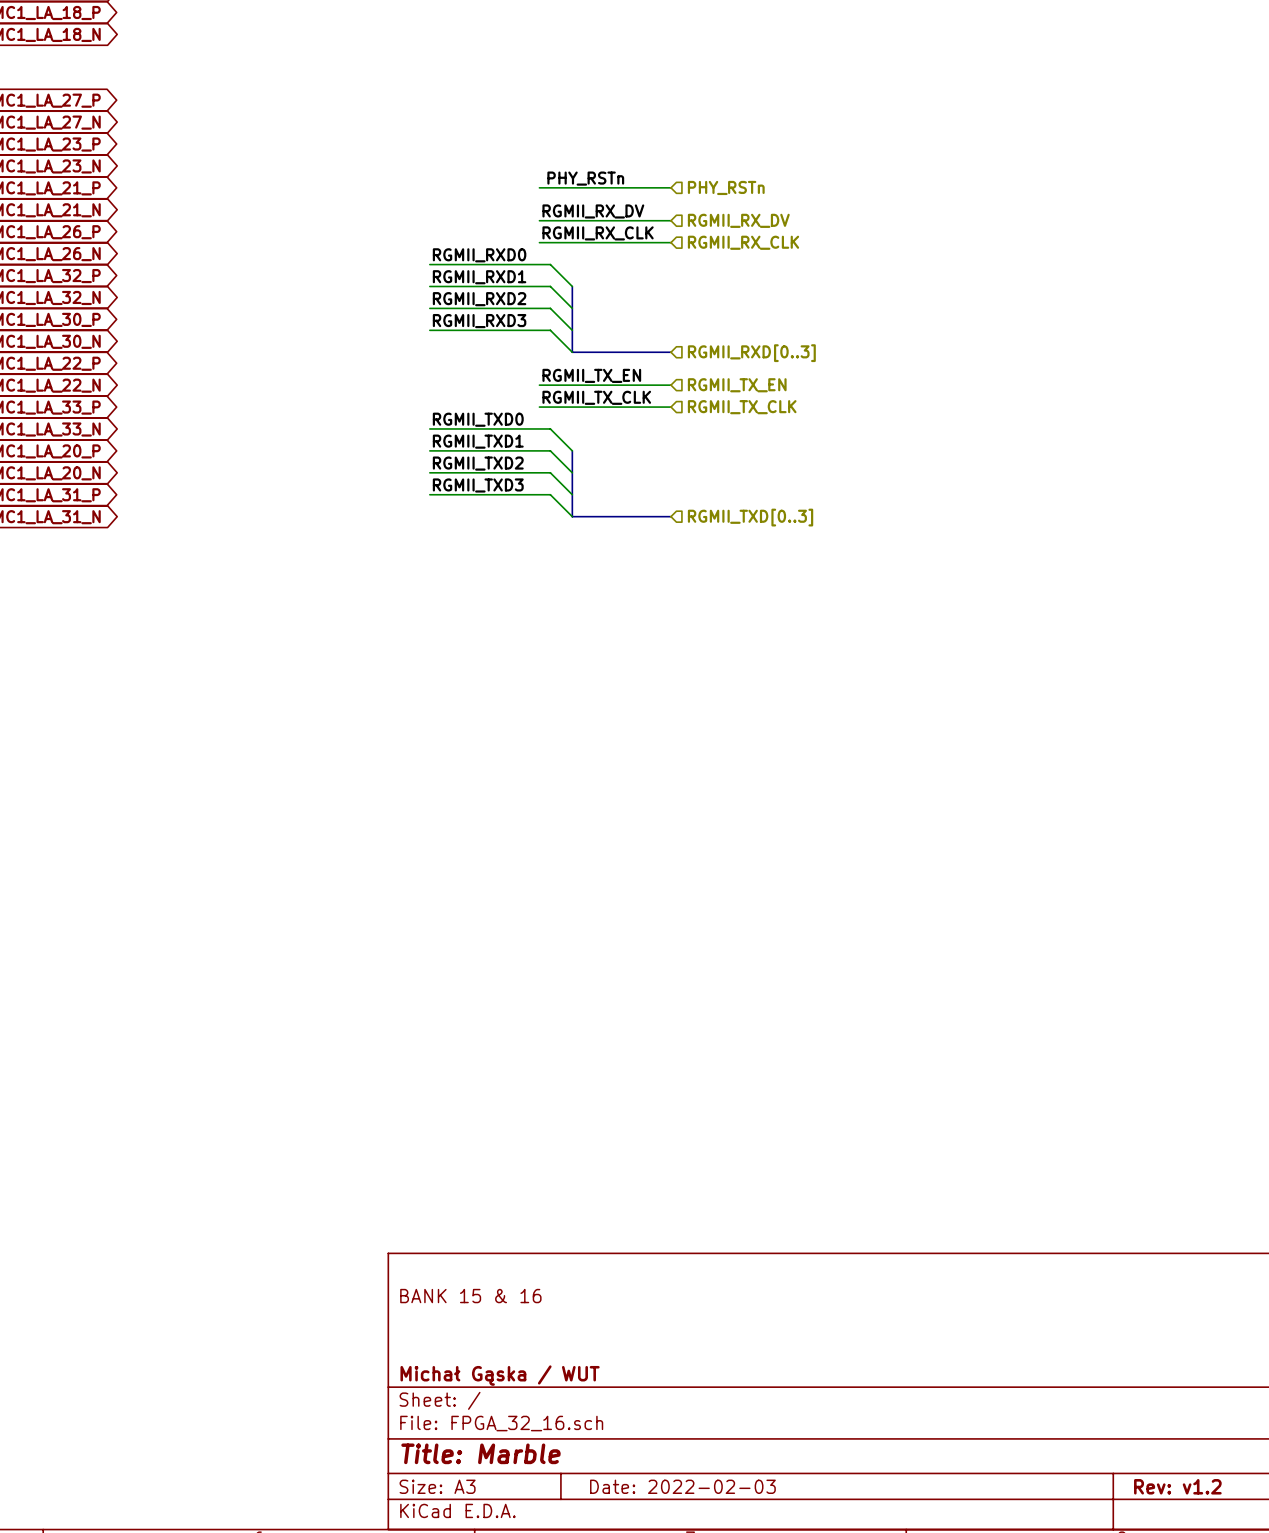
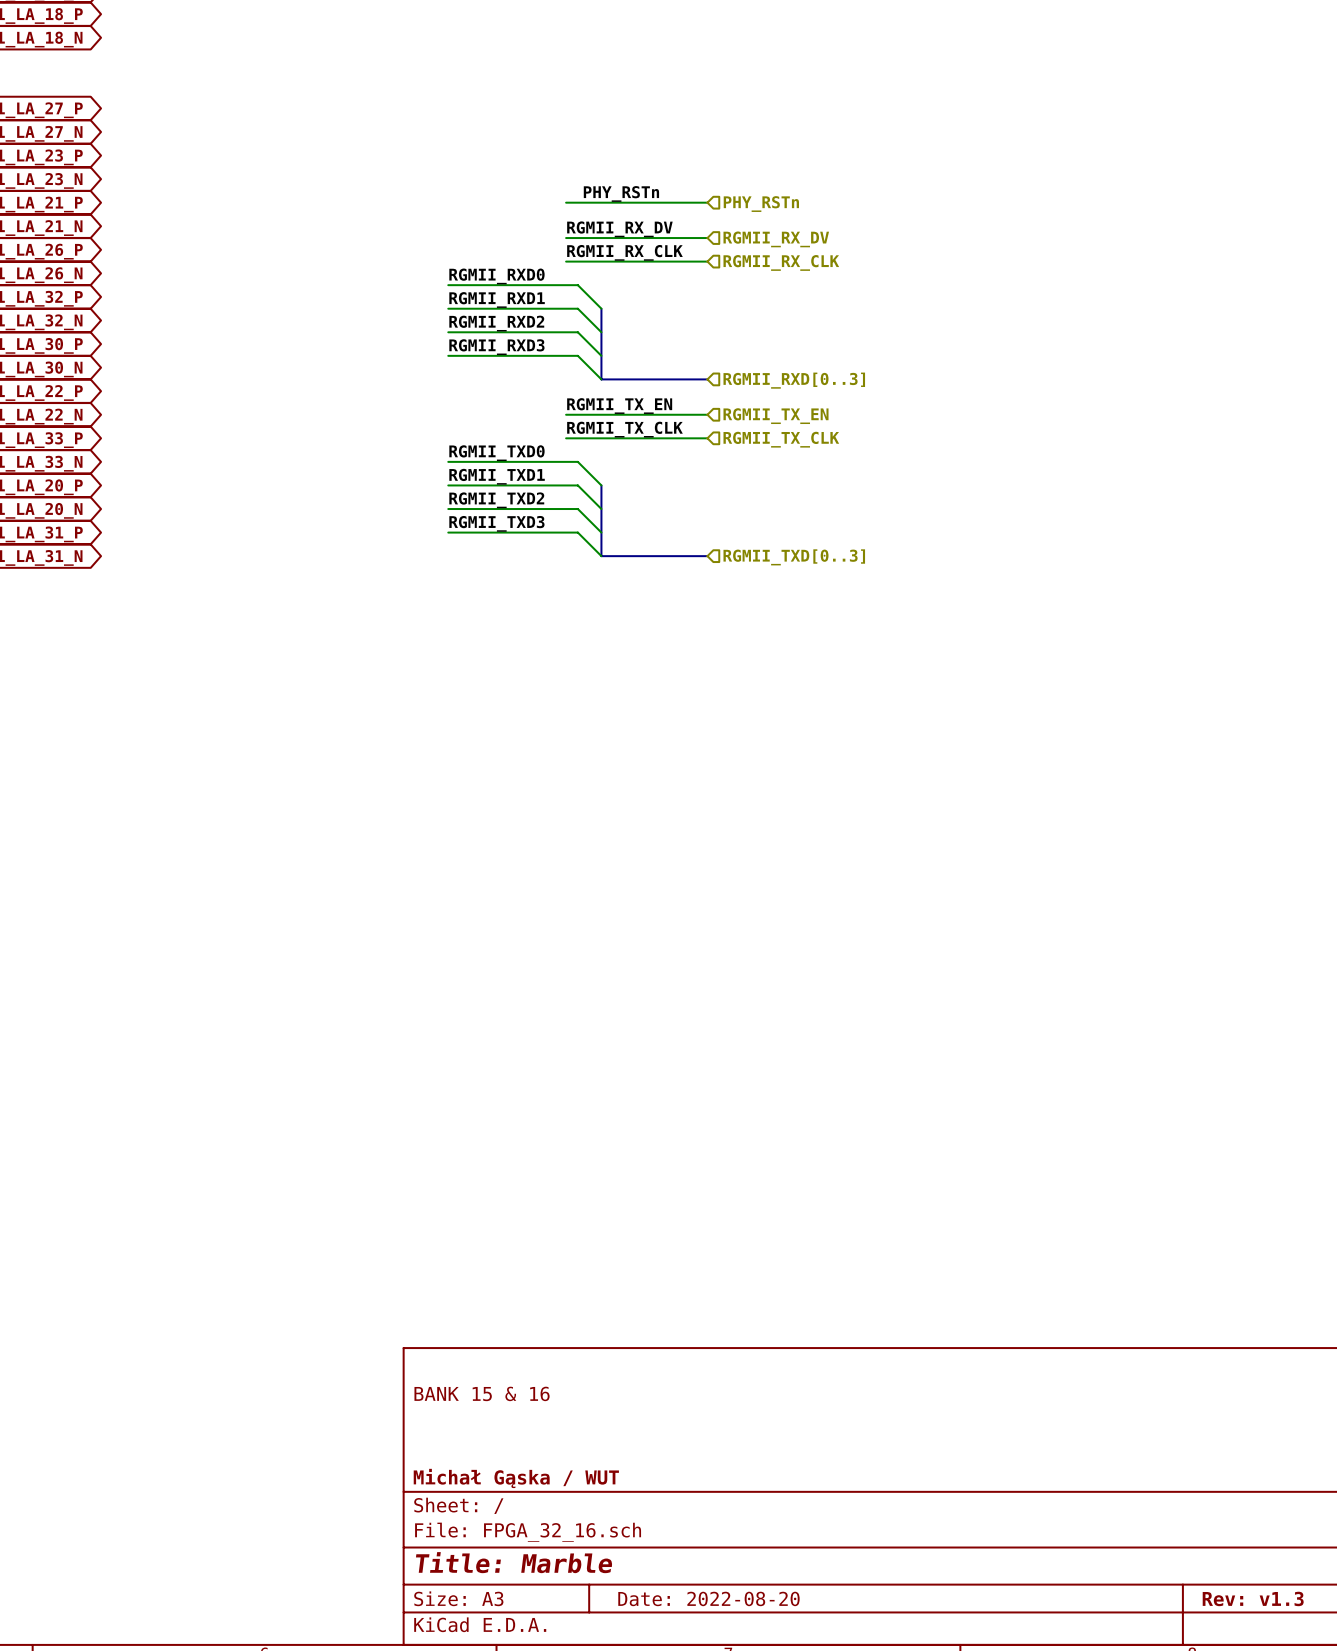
title block: Date: 2022-02-03 (682, 1486) -> Date: 2022-08-20 (708, 1598)
title block: Rev: v1.2 (1177, 1486) -> Rev: v1.3 (1253, 1598)

